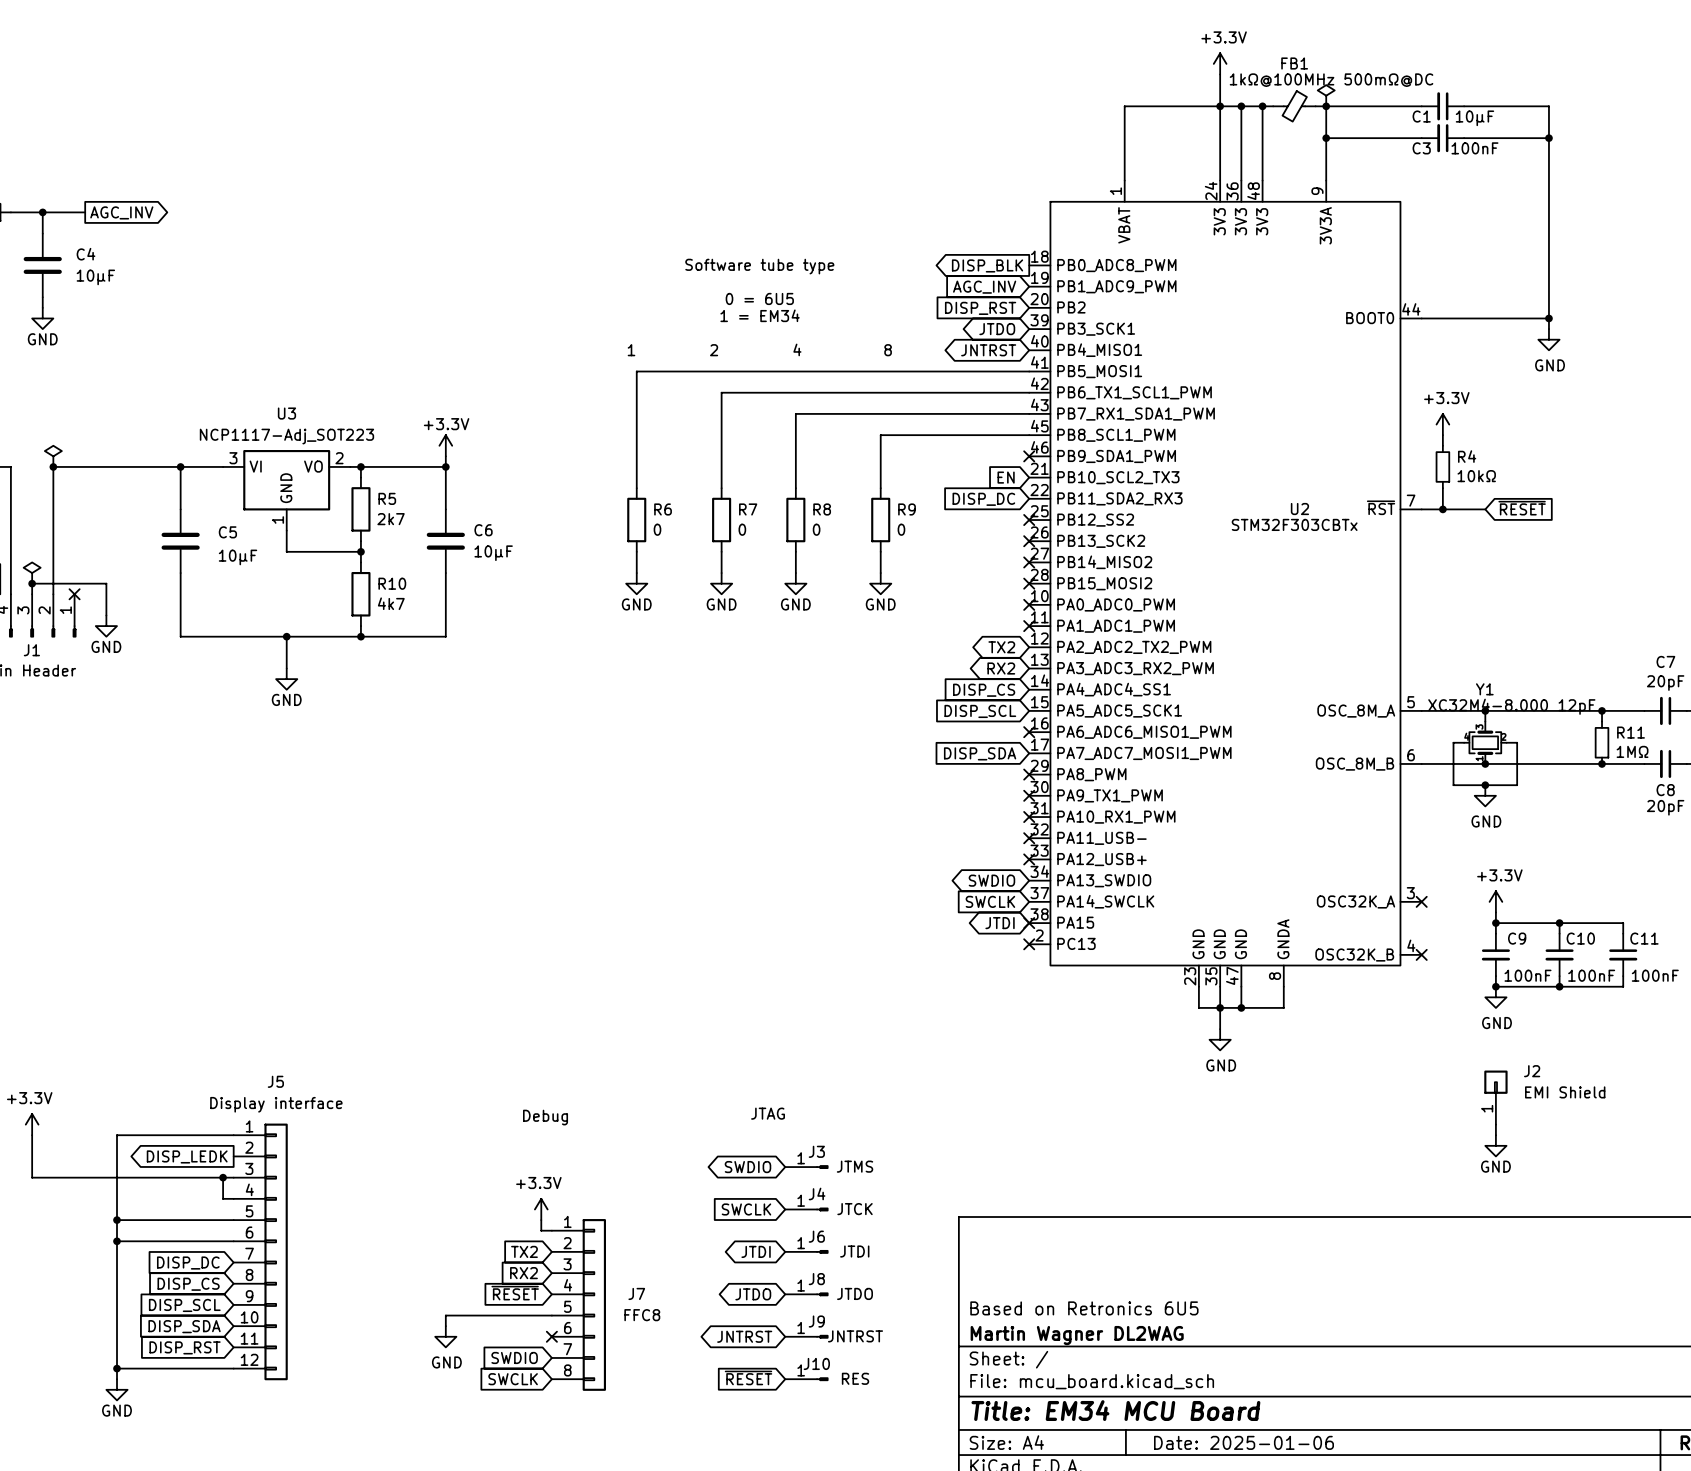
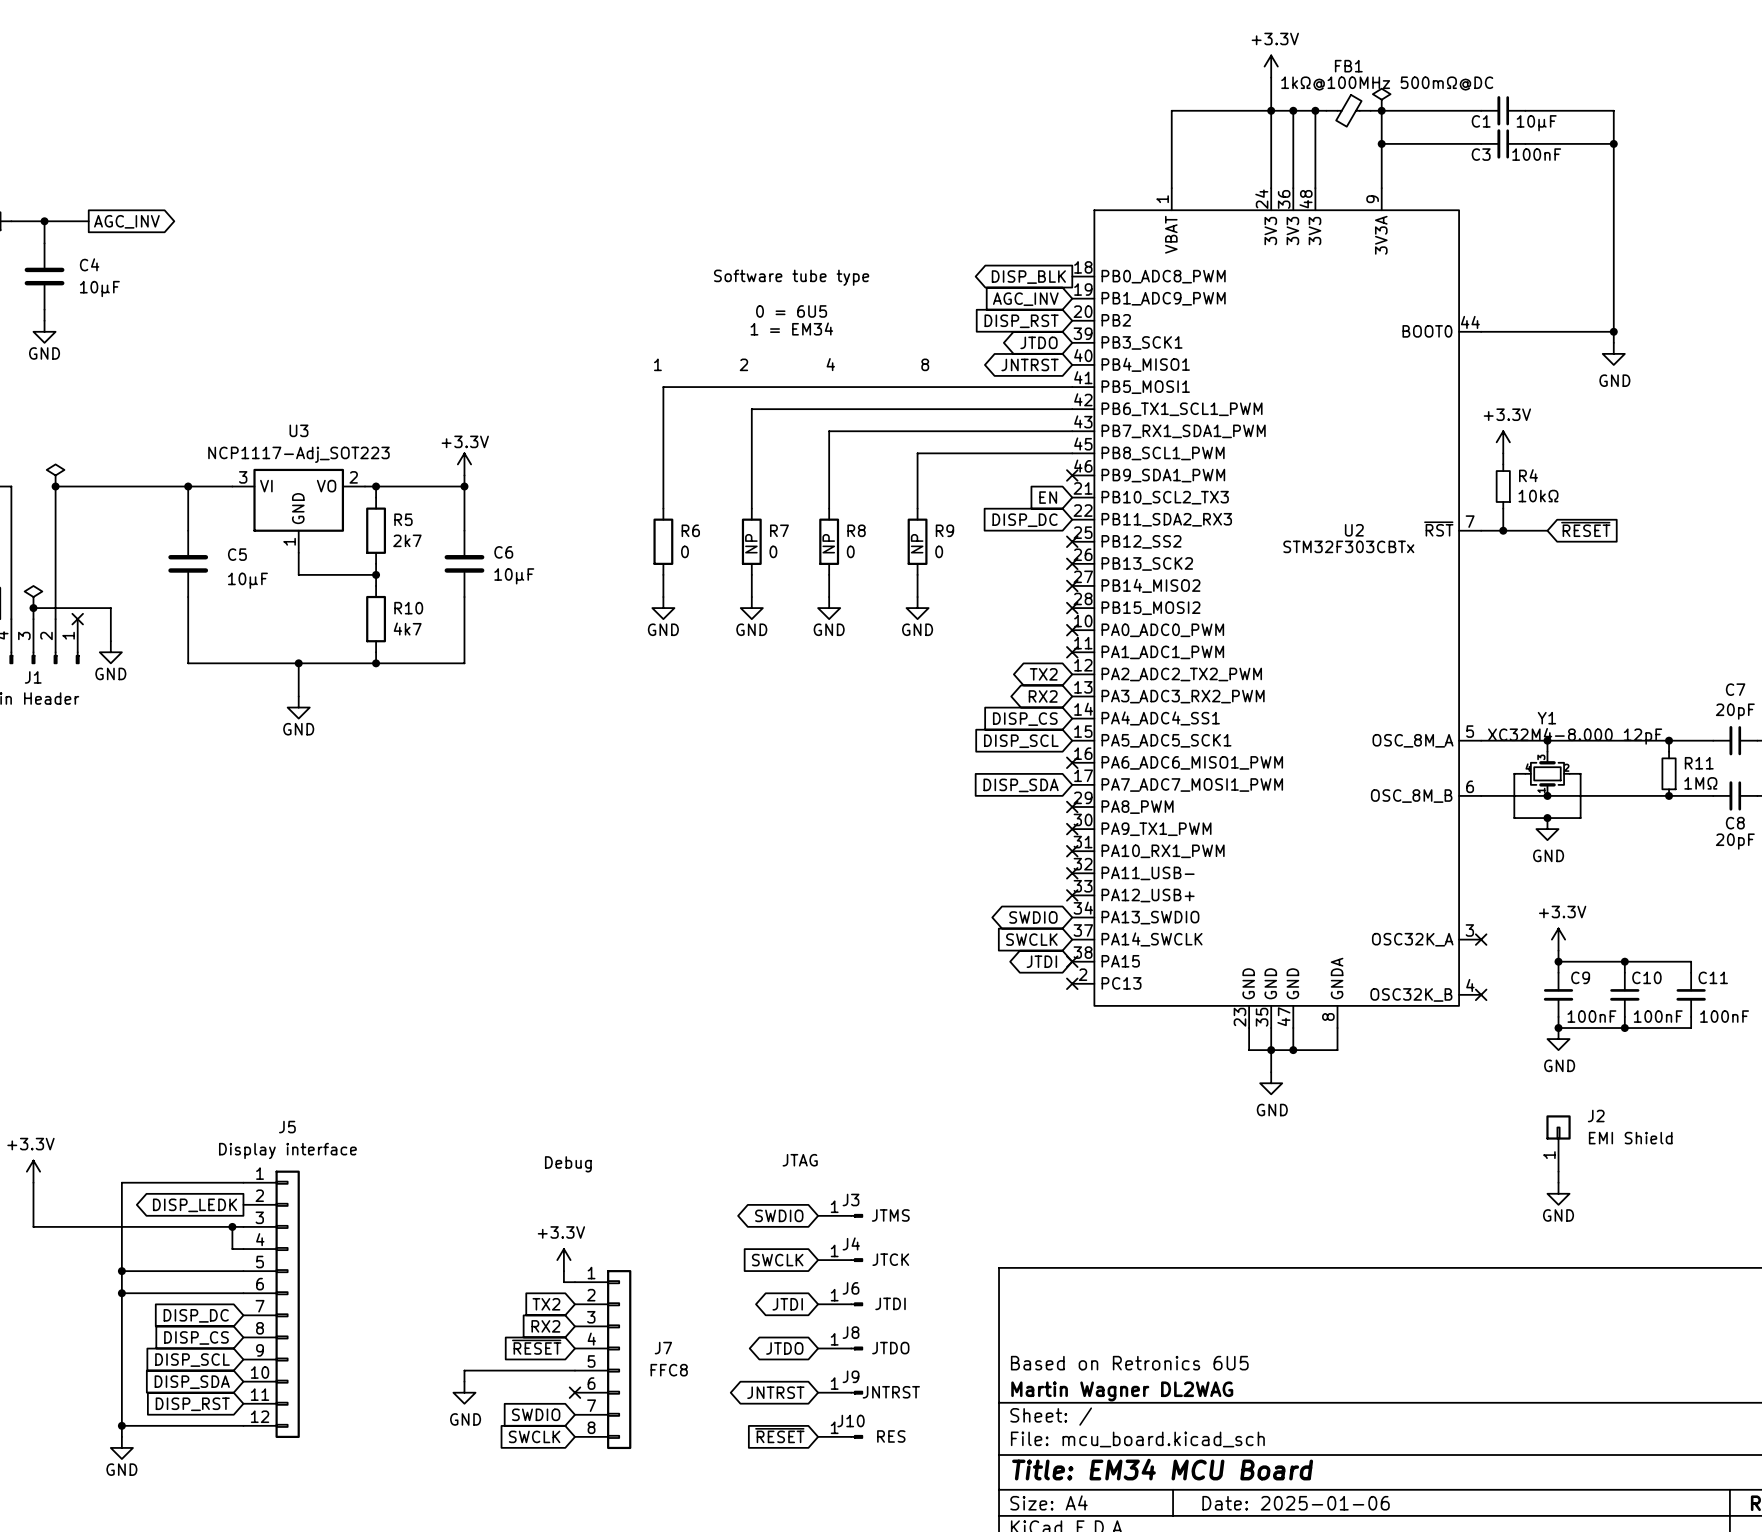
R7 text: none -> NP (751, 543)
R8 text: none -> NP (828, 543)
R9 text: none -> NP (917, 543)

